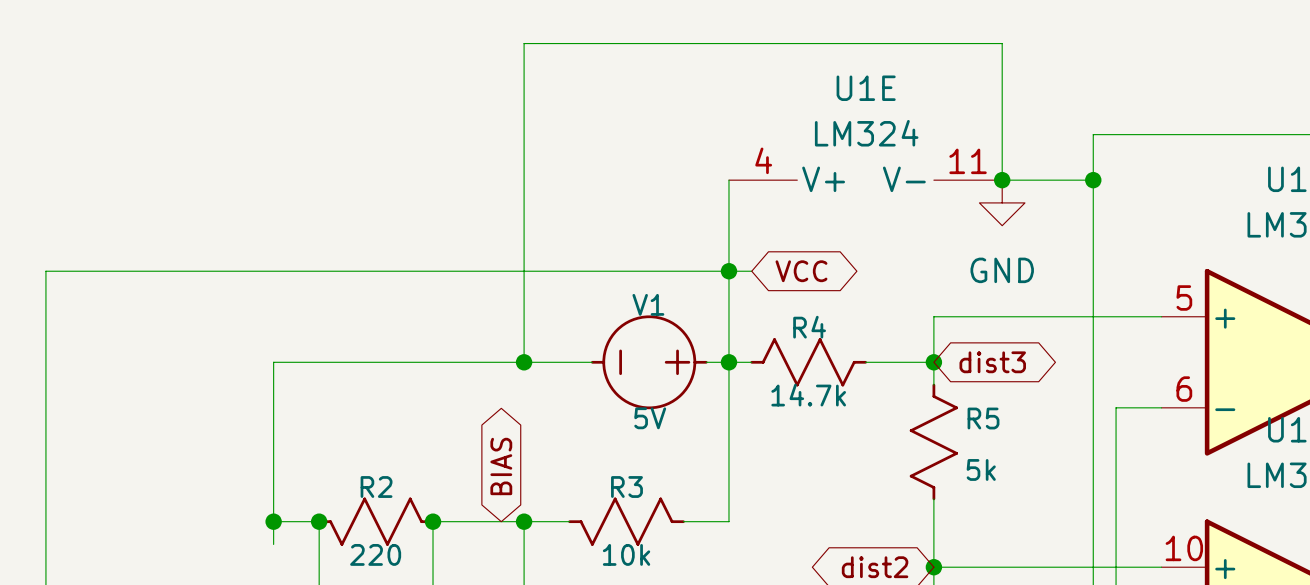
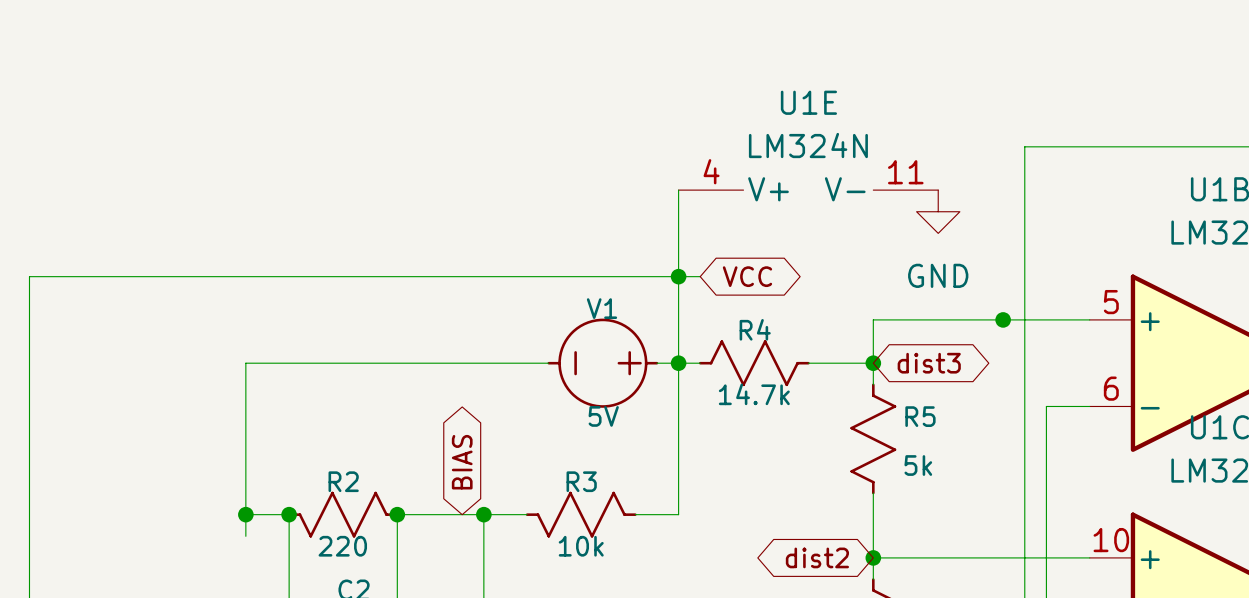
U1E value: LM324 (866, 133) -> LM324N (808, 145)
junction: (1002, 180) -> none
wire: (1093, 180) (1002, 180) (1002, 43) (524, 43) (524, 362) -> none
junction: (1093, 180) -> none
junction: none -> (1003, 319)
junction: (524, 362) -> none

